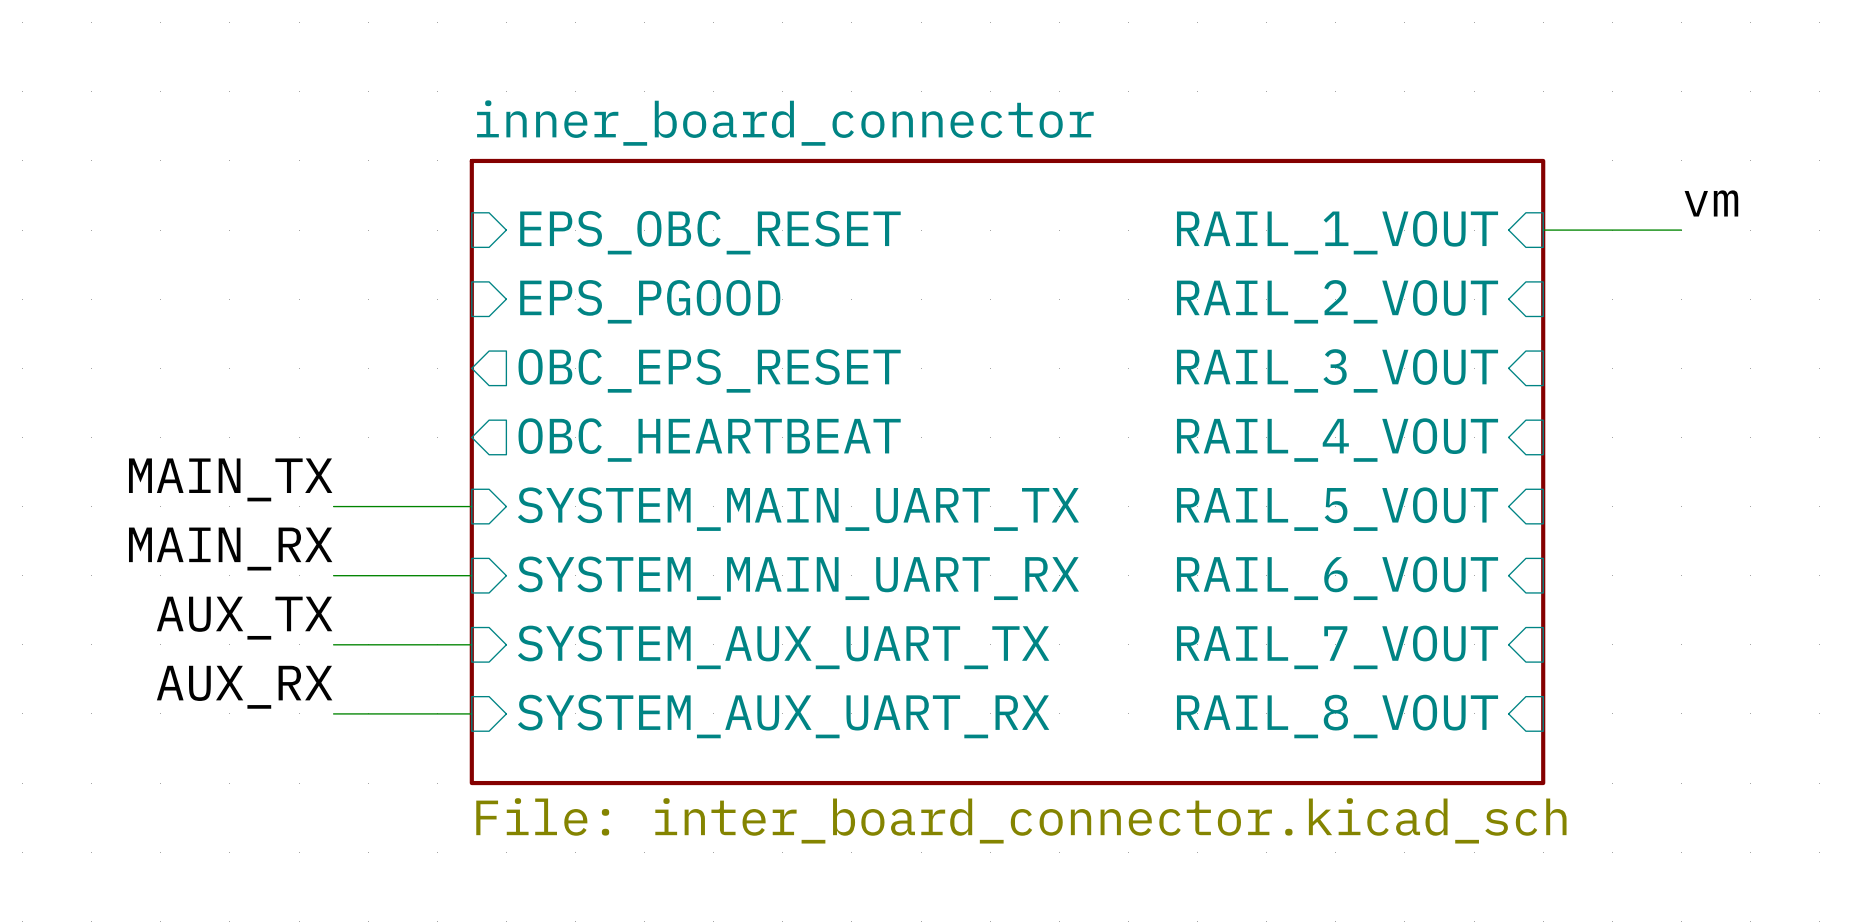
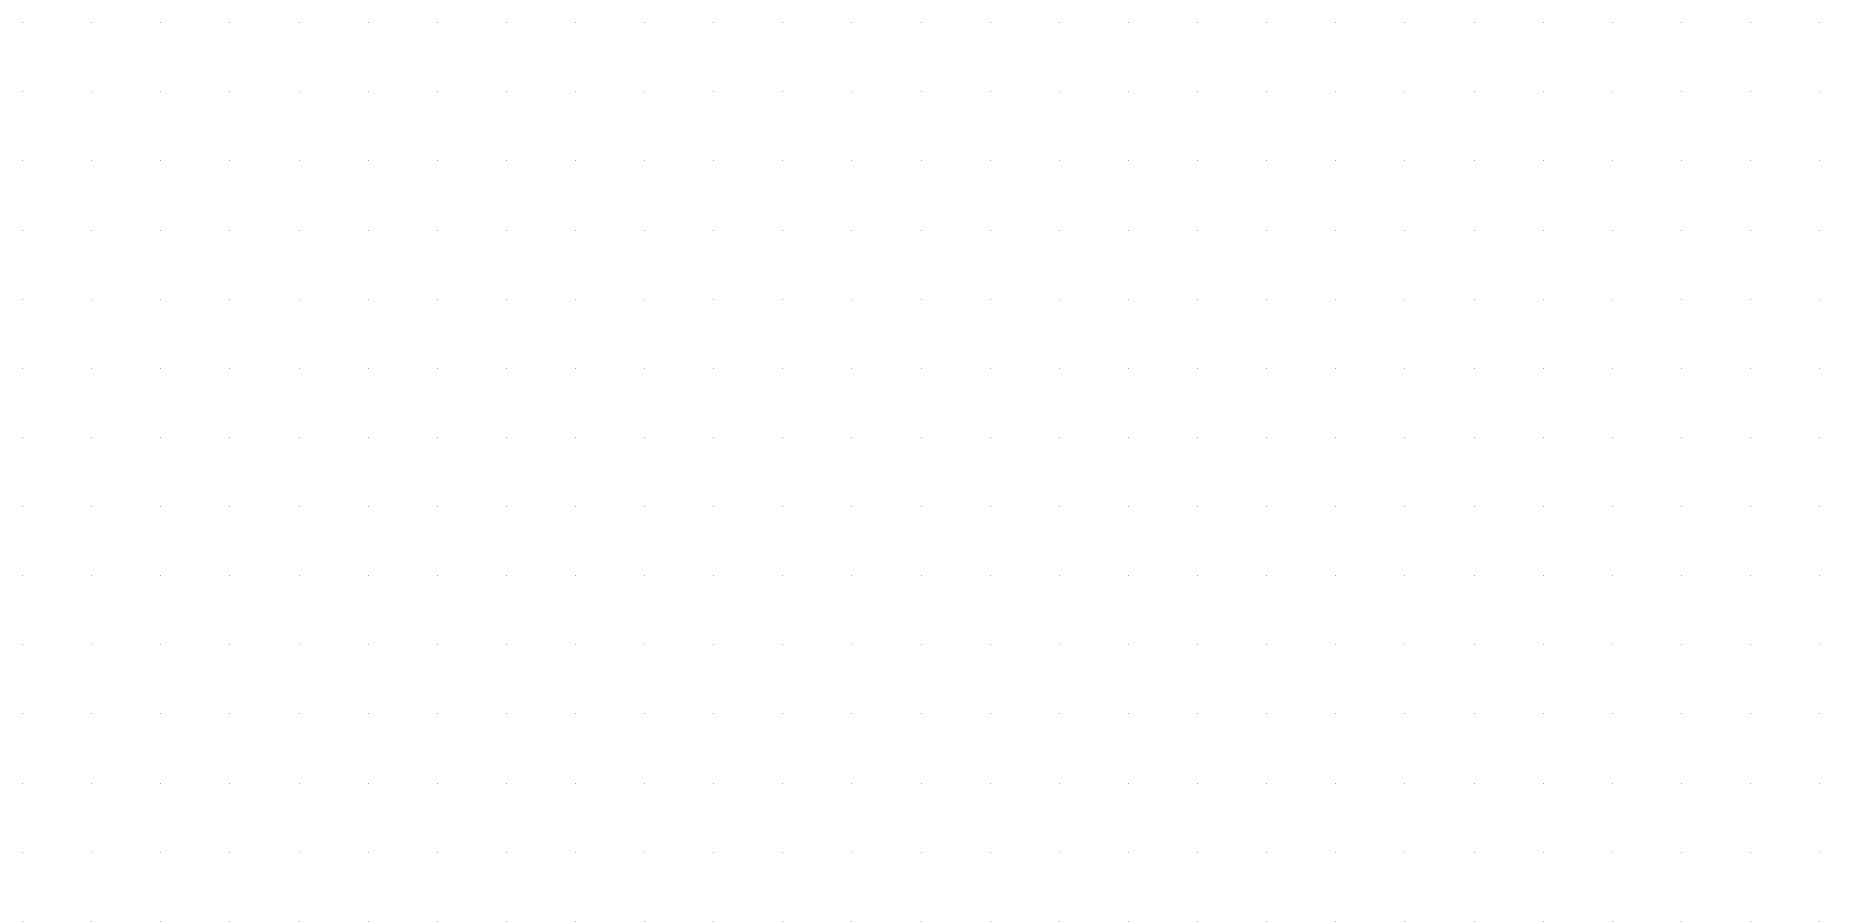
label: vm (1711, 203) -> none
wire: (1543, 230) (1681, 230) -> none
sheet pin: EPS_OBC_RESET (710, 232) -> none
sheet pin: RAIL_1_VOUT (1337, 232) -> none
sheet pin: EPS_PGOOD (650, 301) -> none
sheet pin: RAIL_2_VOUT (1337, 301) -> none
sheet pin: OBC_EPS_RESET (709, 370) -> none
sheet pin: RAIL_3_VOUT (1337, 370) -> none
sheet pin: OBC_HEARTBEAT (709, 440) -> none
sheet pin: RAIL_4_VOUT (1337, 440) -> none
sheet inner_board_connector: File: inter_board_connector.kicad_sch (1007, 472) -> none
label: MAIN_TX (230, 479) -> none
wire: (333, 506) (471, 506) -> none
sheet pin: SYSTEM_MAIN_UART_TX (798, 509) -> none
sheet pin: RAIL_5_VOUT (1337, 509) -> none
label: MAIN_RX (230, 549) -> none
wire: (333, 575) (471, 575) -> none
sheet pin: SYSTEM_MAIN_UART_RX (798, 578) -> none
sheet pin: RAIL_6_VOUT (1337, 578) -> none
label: AUX_TX (244, 618) -> none
wire: (333, 644) (471, 644) -> none
sheet pin: SYSTEM_AUX_UART_TX (783, 647) -> none
sheet pin: RAIL_7_VOUT (1337, 647) -> none
label: AUX_RX (244, 687) -> none
wire: (333, 713) (471, 713) -> none
sheet pin: SYSTEM_AUX_UART_RX (783, 716) -> none
sheet pin: RAIL_8_VOUT (1337, 716) -> none

